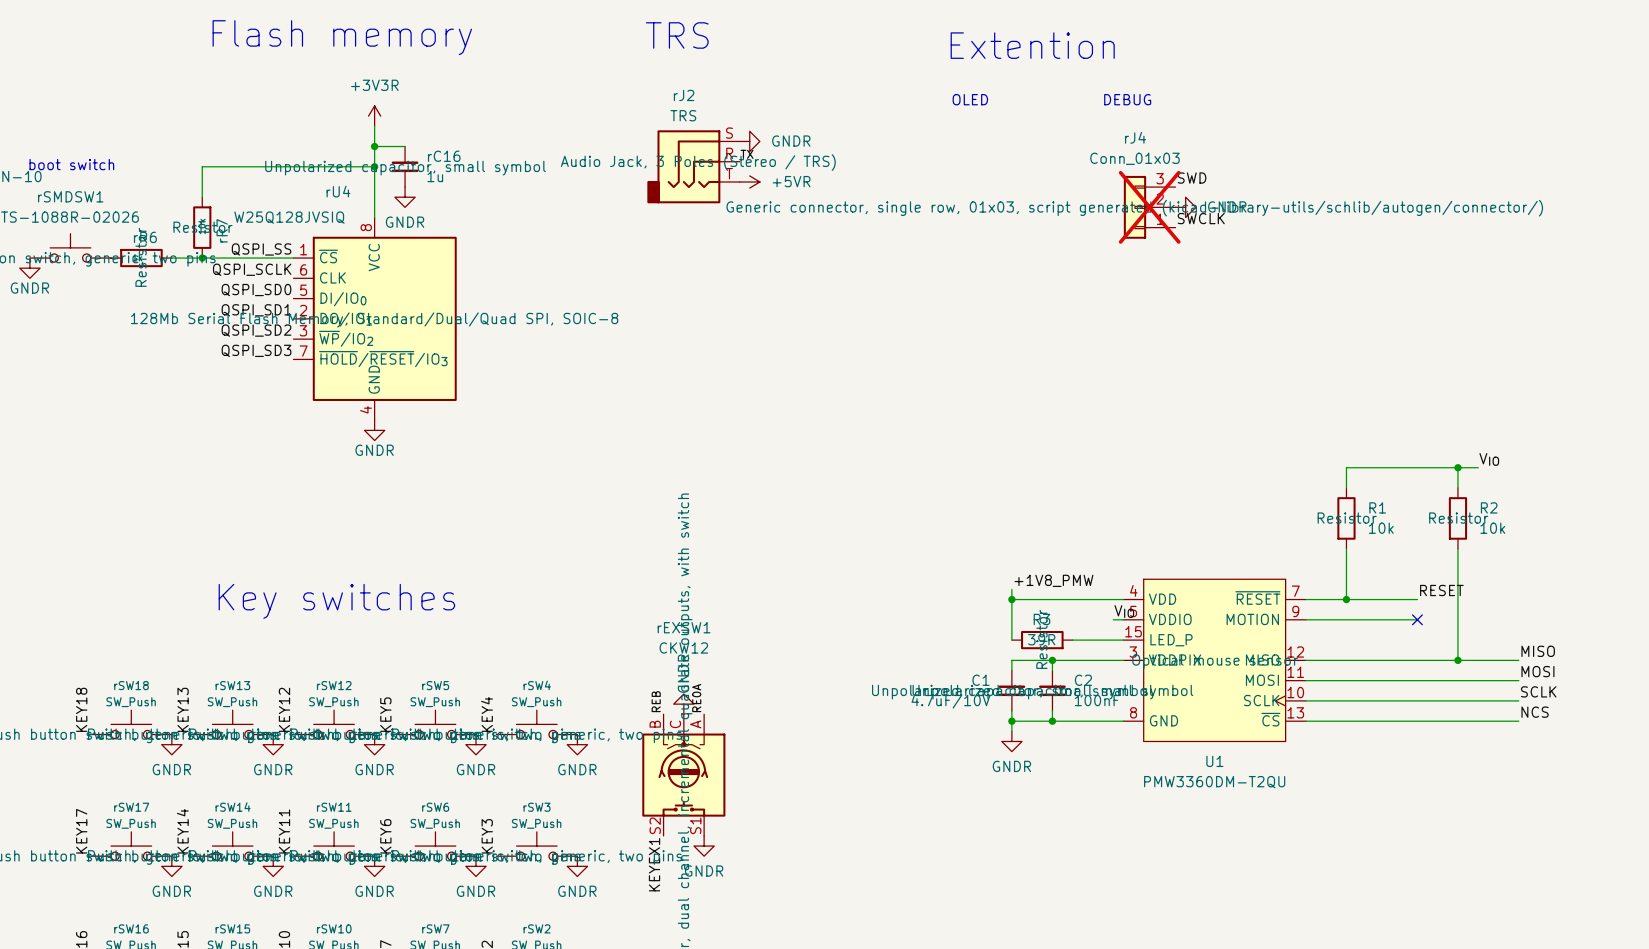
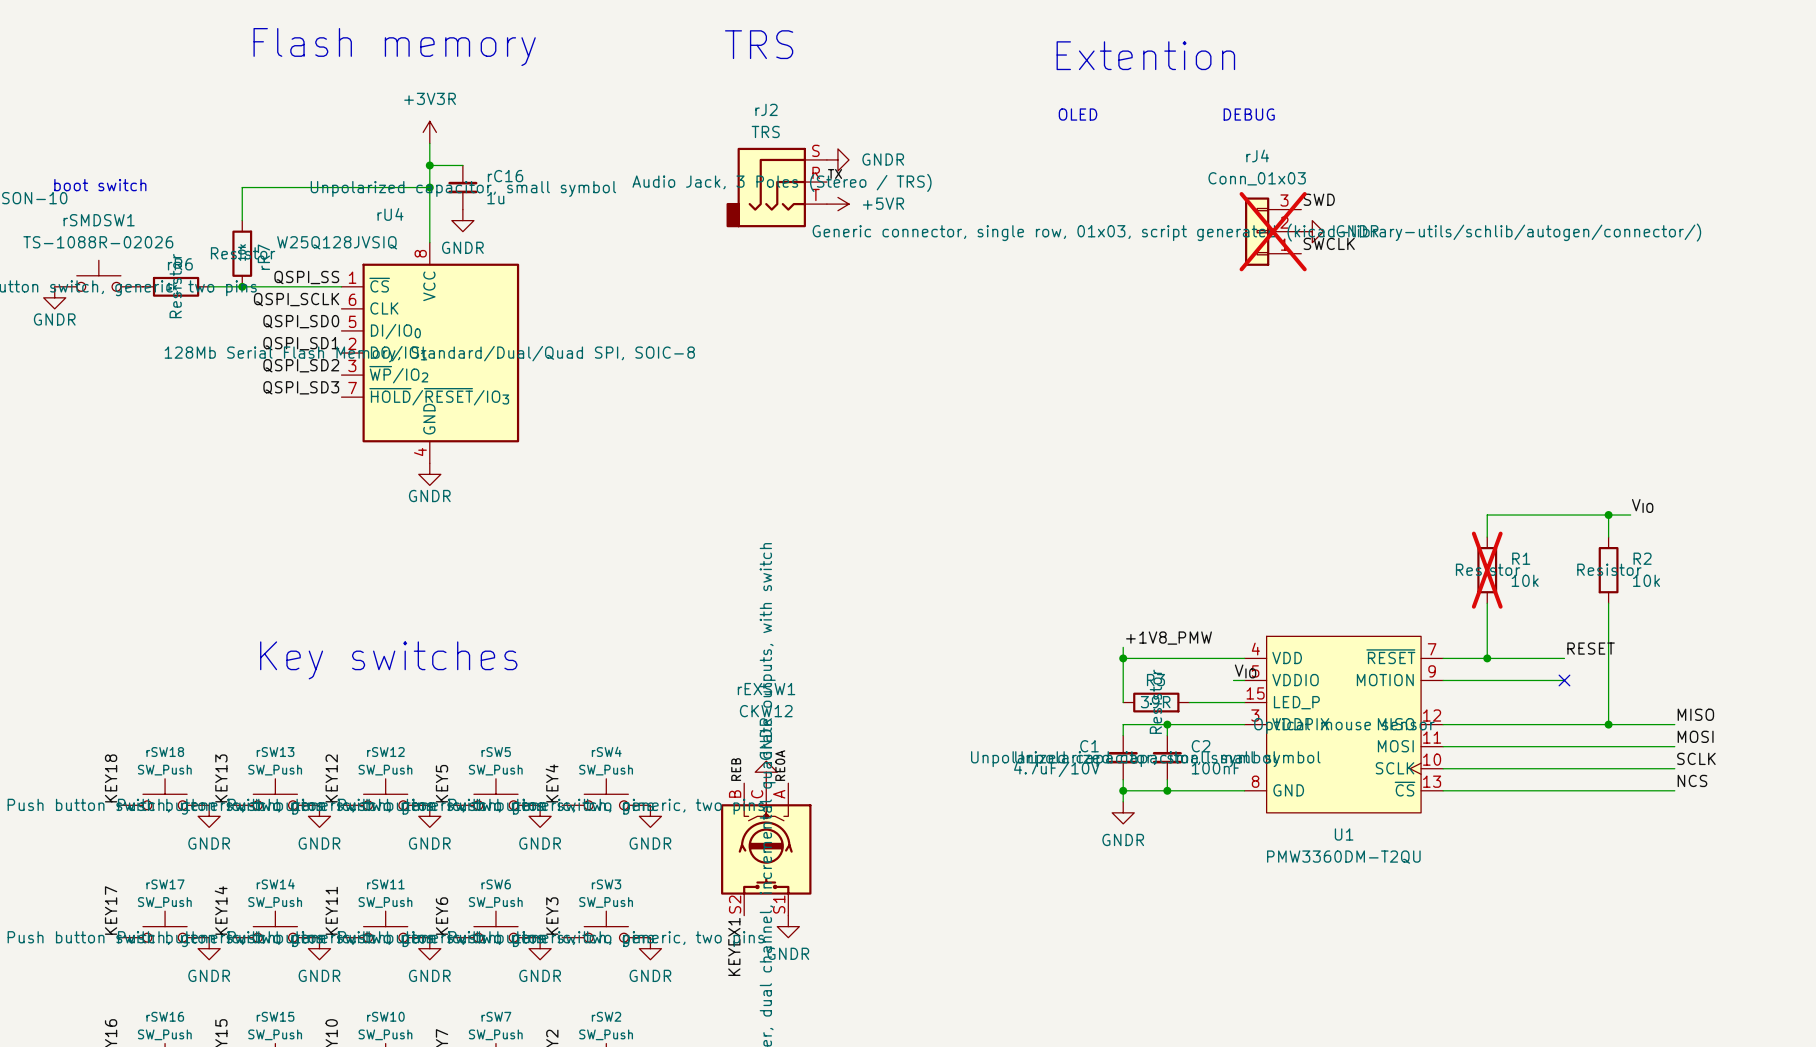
R1 do-not-place cross: none -> (1487, 570)

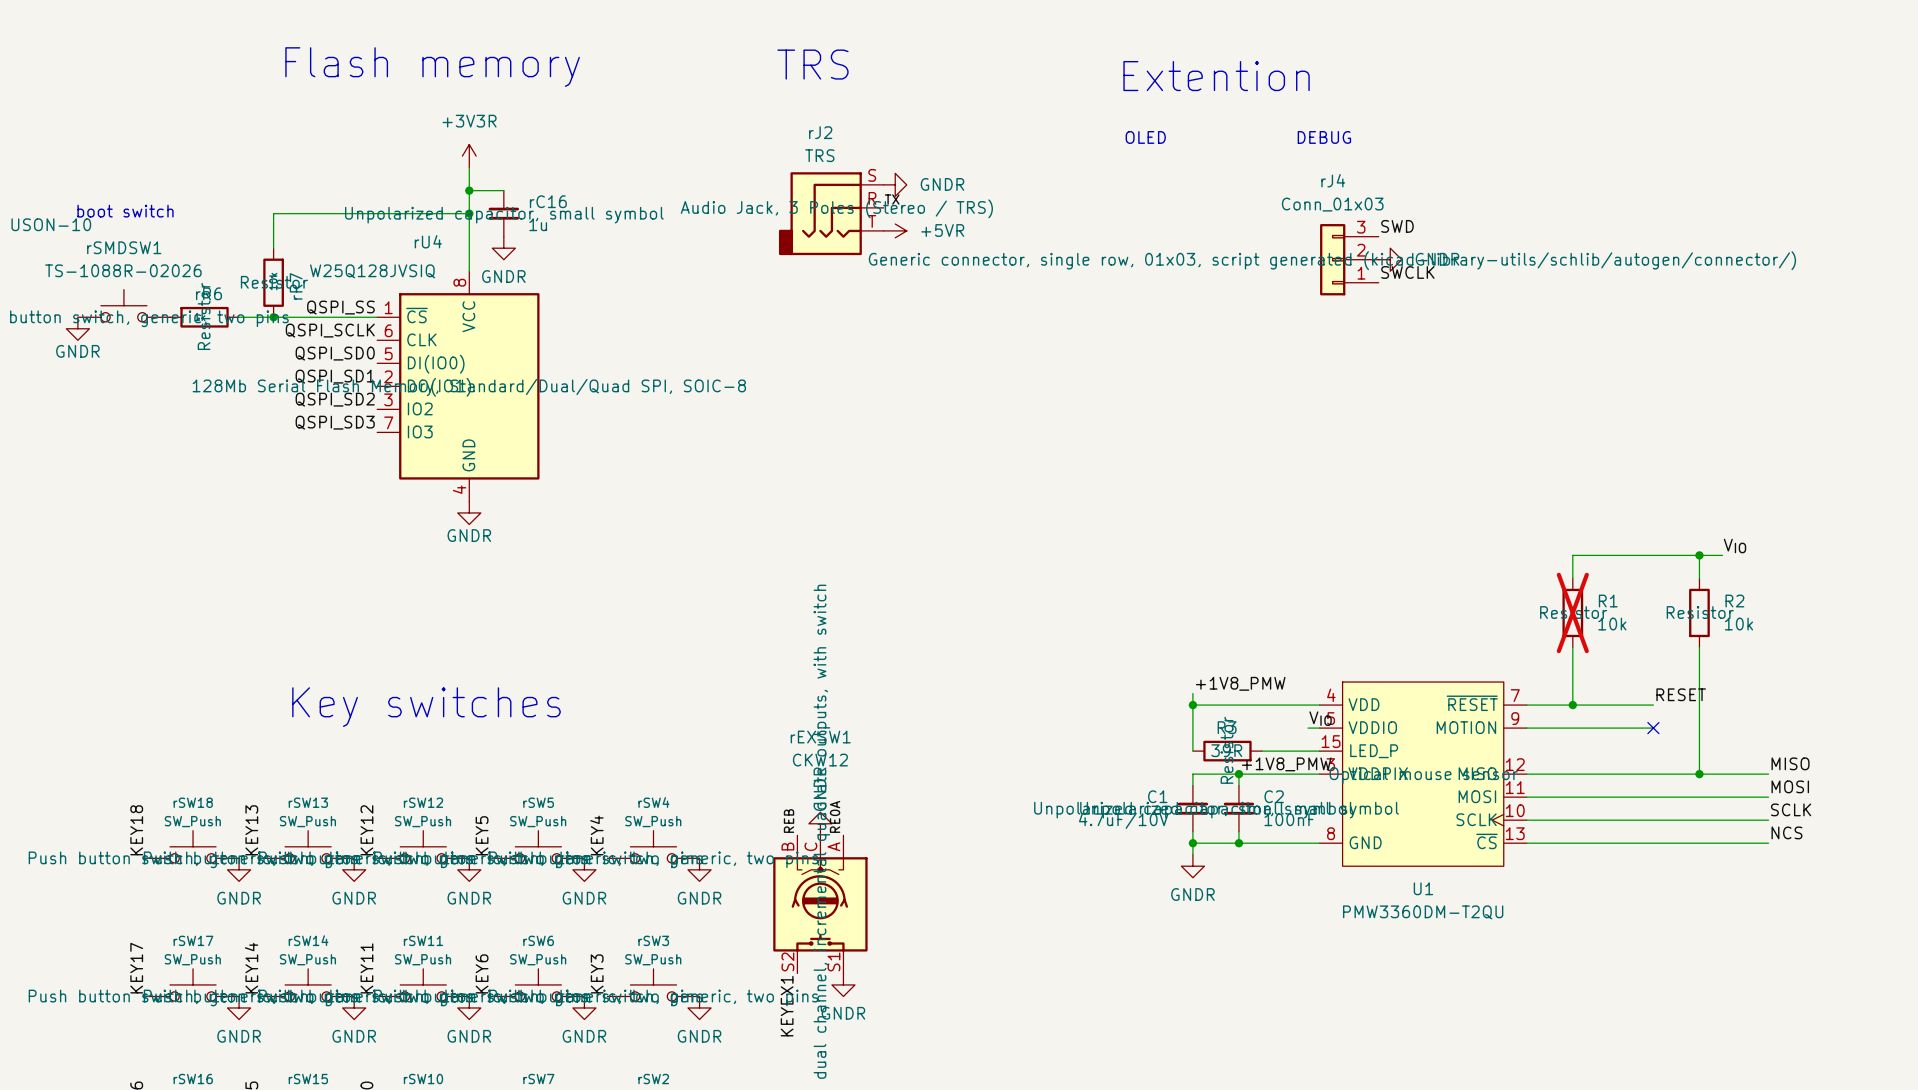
rJ4 do-not-place cross: (1273, 231) -> none
rU4 symbol: [341, 242, 520, 464] -> [377, 271, 540, 502]
label: none -> +1V8_PMW (1286, 764)

